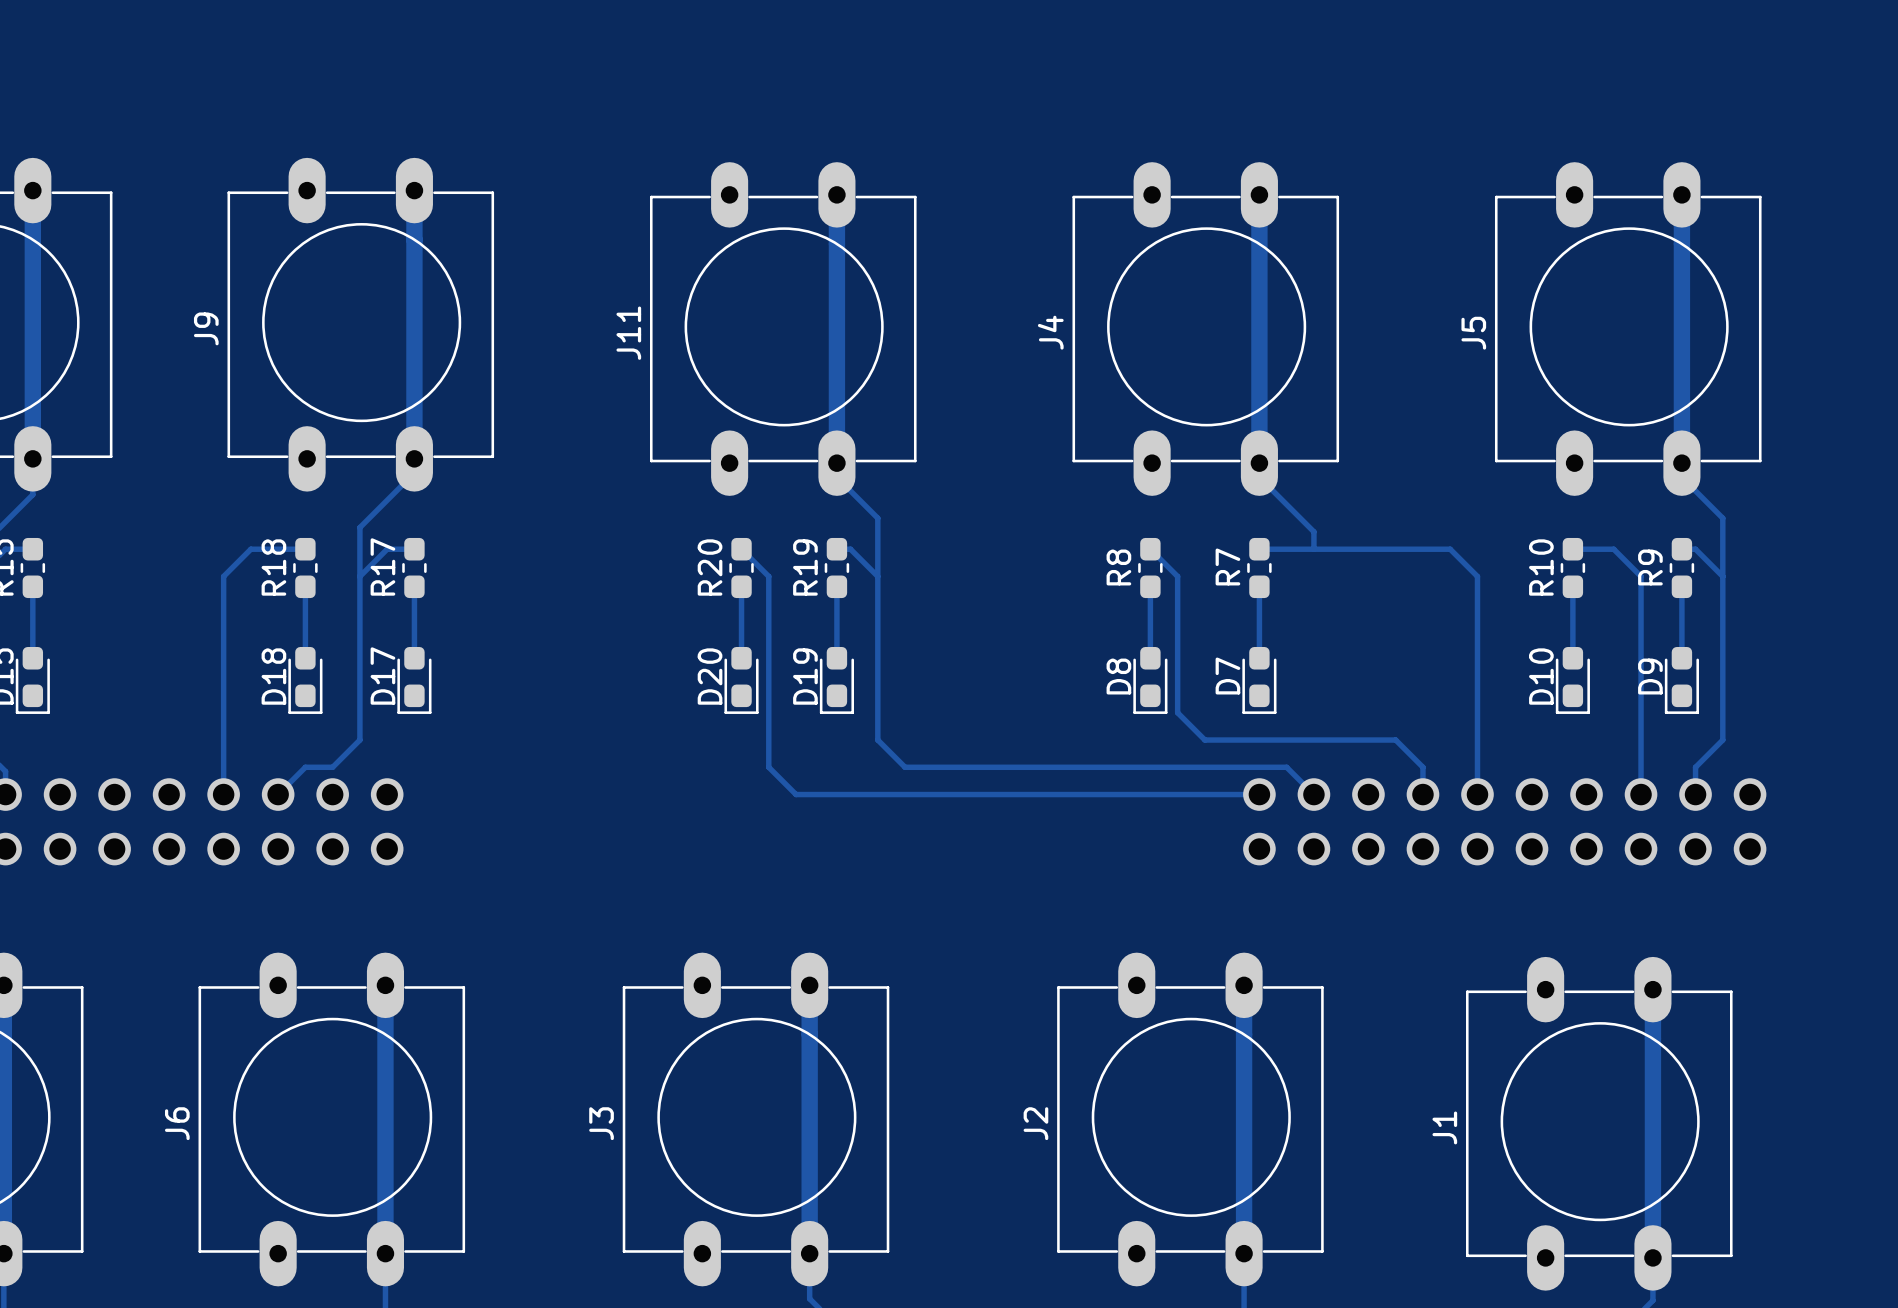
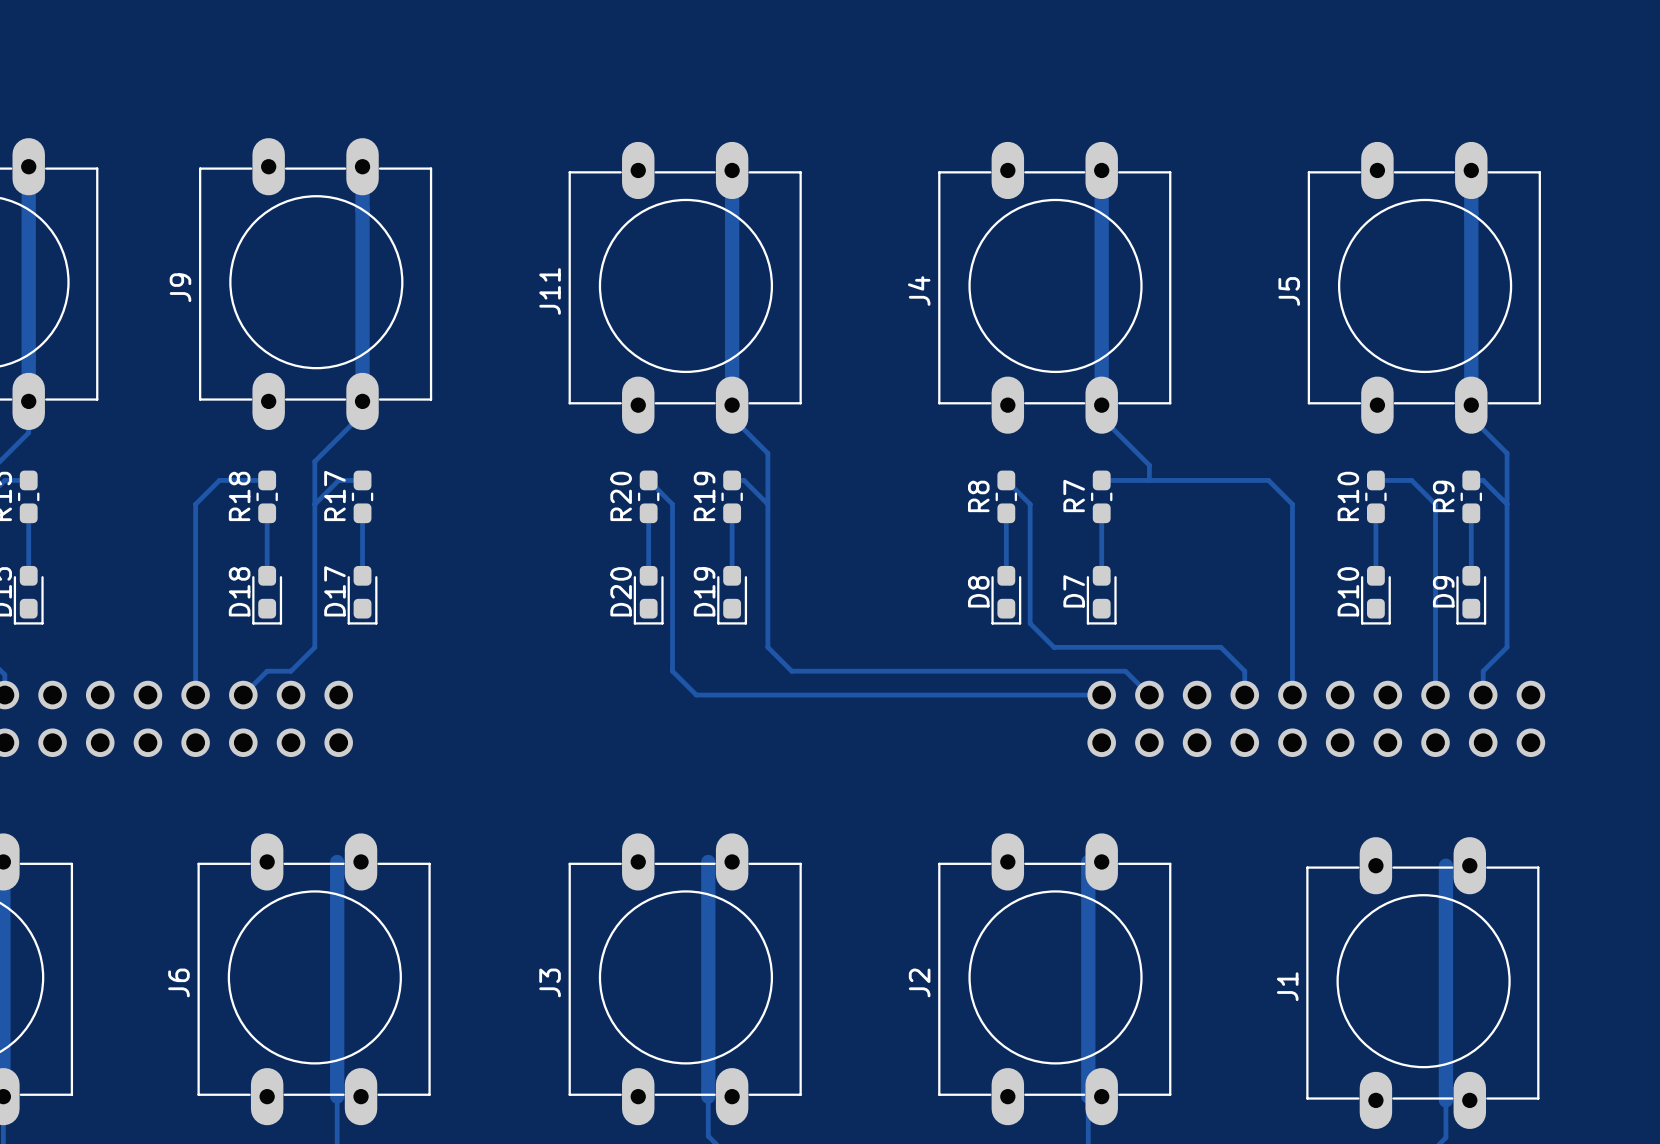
J6 position: (331, 1119) -> (314, 979)
J3 position: (756, 1119) -> (685, 979)
J2 position: (1190, 1119) -> (1054, 979)
J1 position: (1599, 1123) -> (1422, 983)

